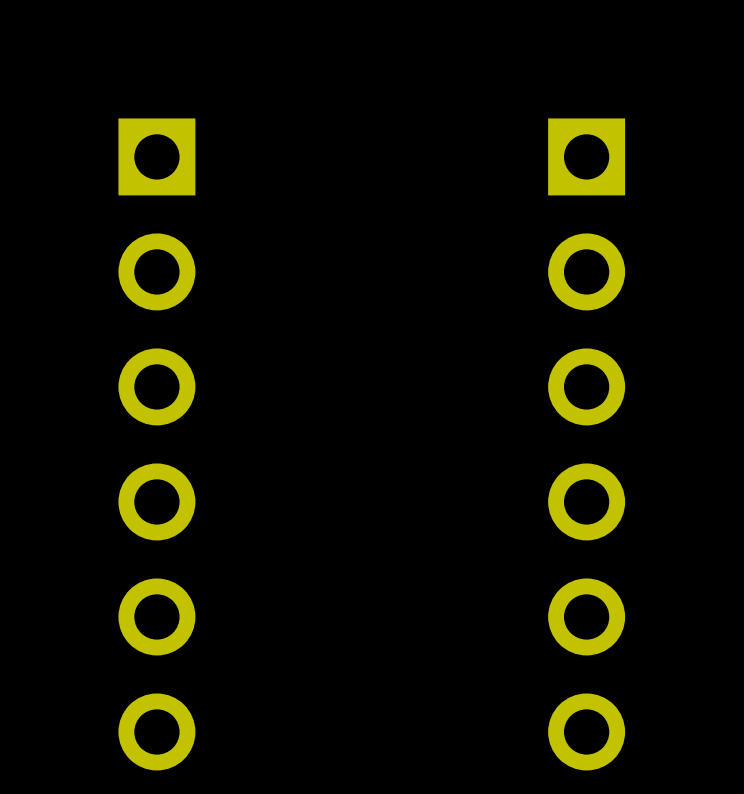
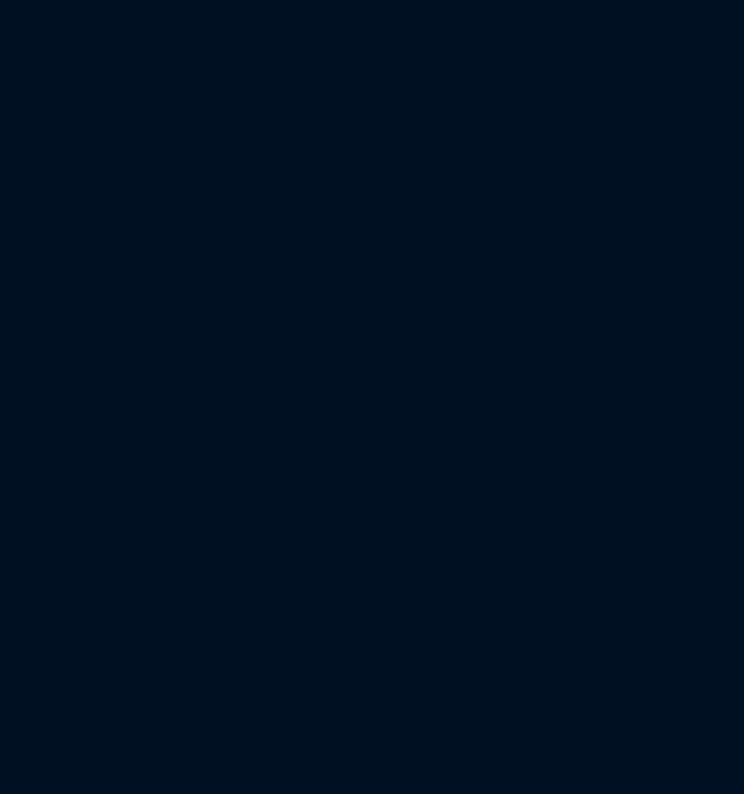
part: (156, 444) -> none
part: (586, 444) -> none

